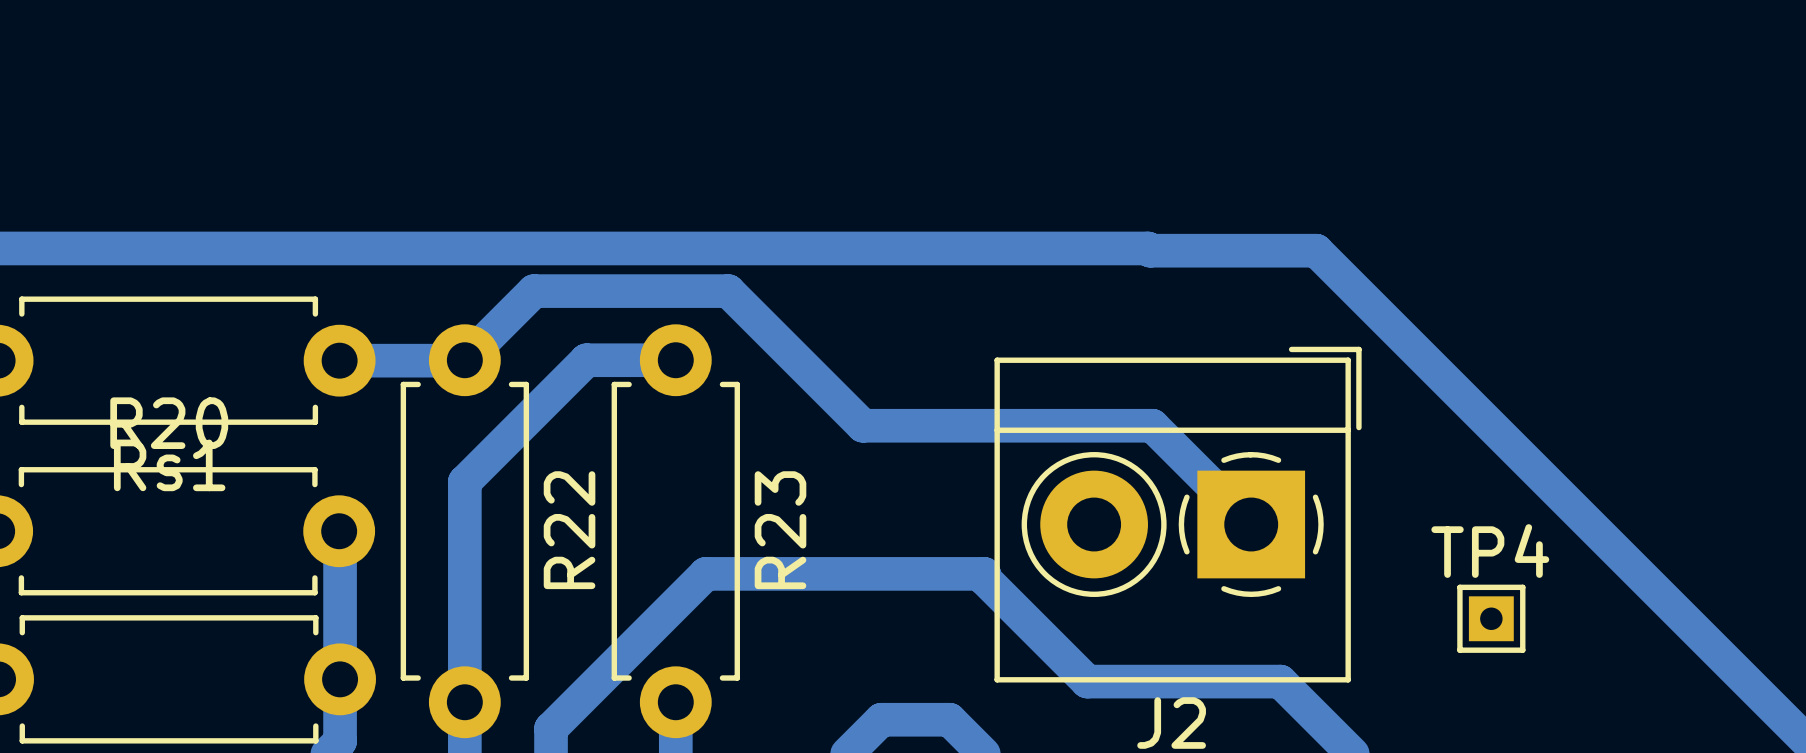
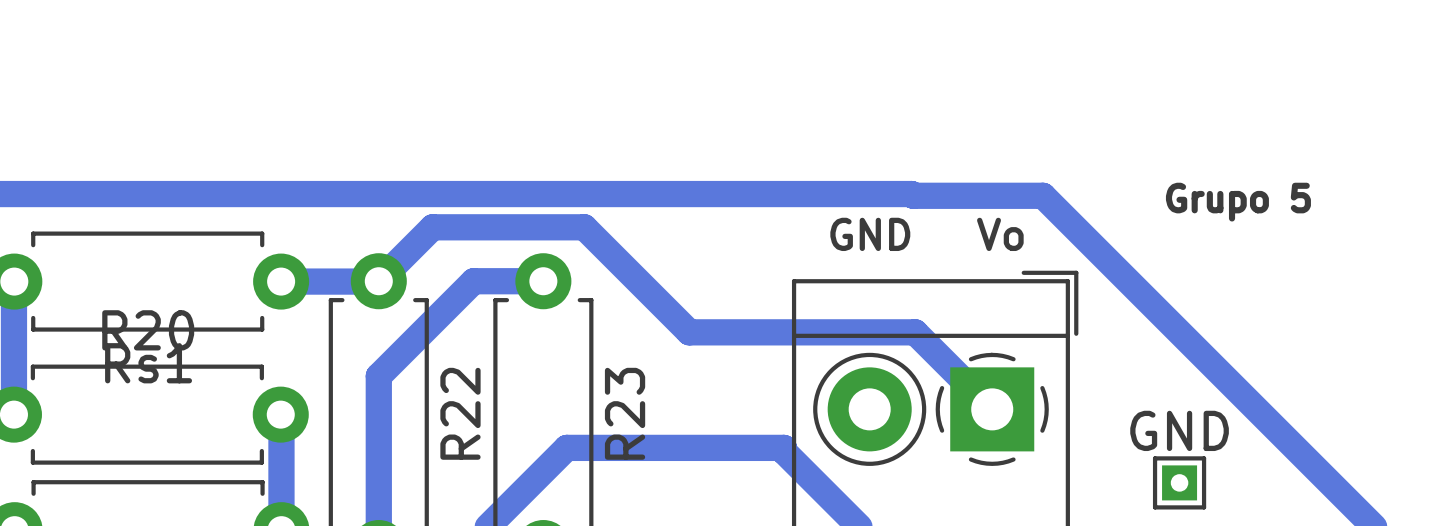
text: none -> Grupo 5 (1238, 202)
text: none -> GND Vo (927, 234)
TP4 name: TP4 (1490, 551) -> GND (1179, 430)

